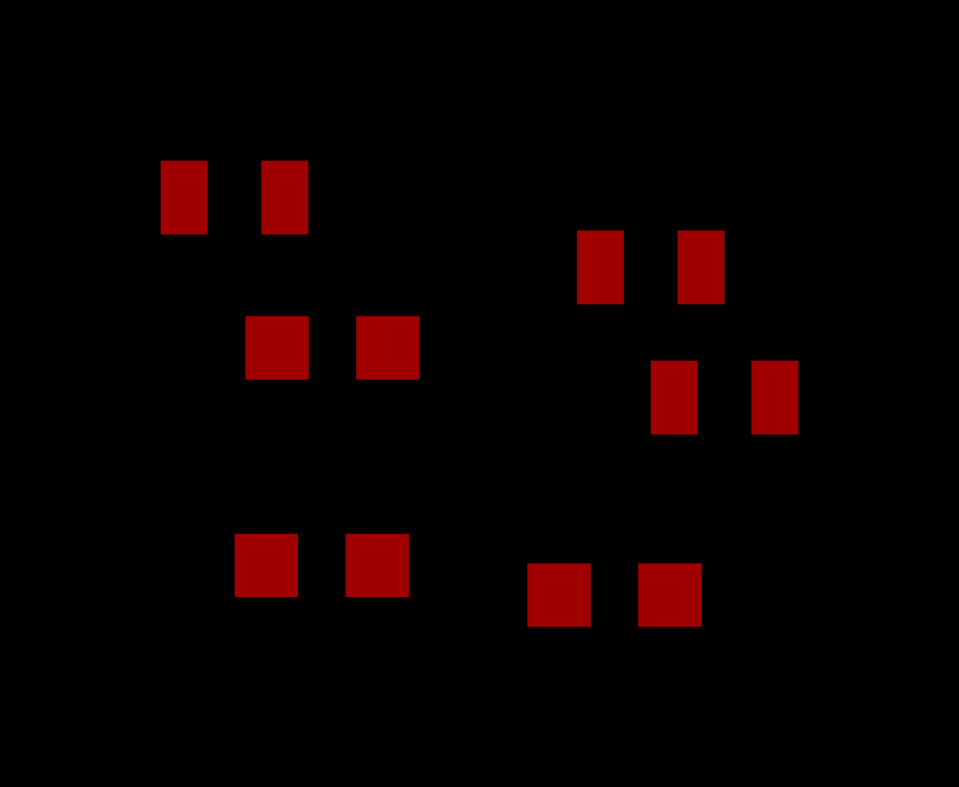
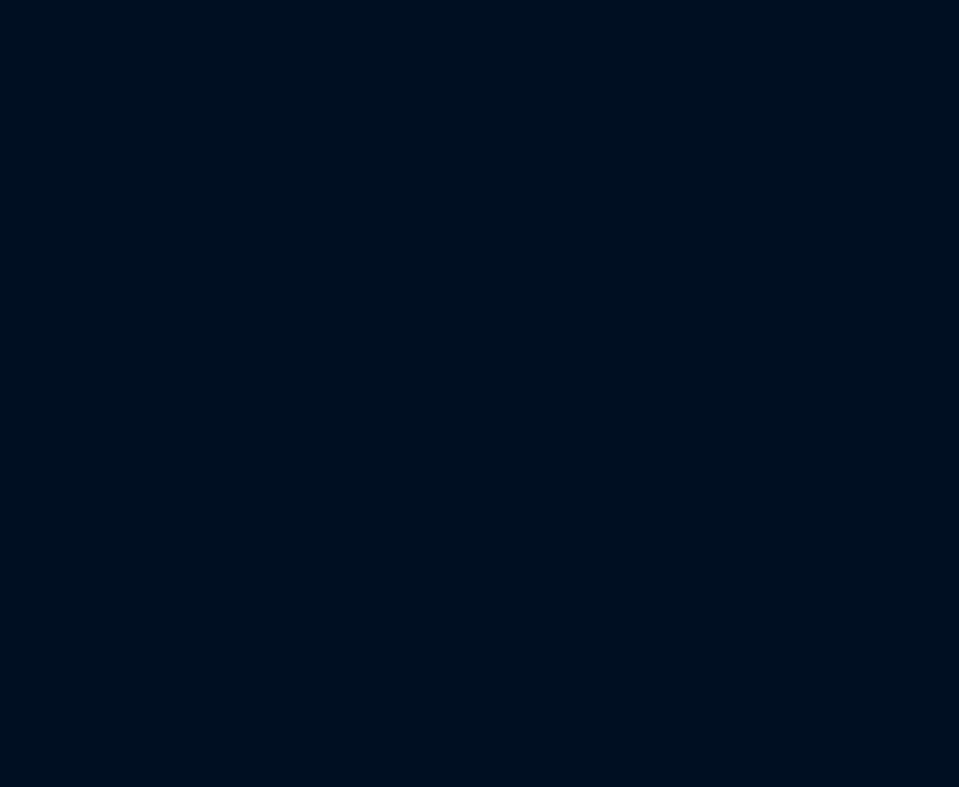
part: (234, 197) -> none
part: (650, 267) -> none
part: (332, 347) -> none
part: (724, 397) -> none
part: (321, 565) -> none
part: (614, 595) -> none

